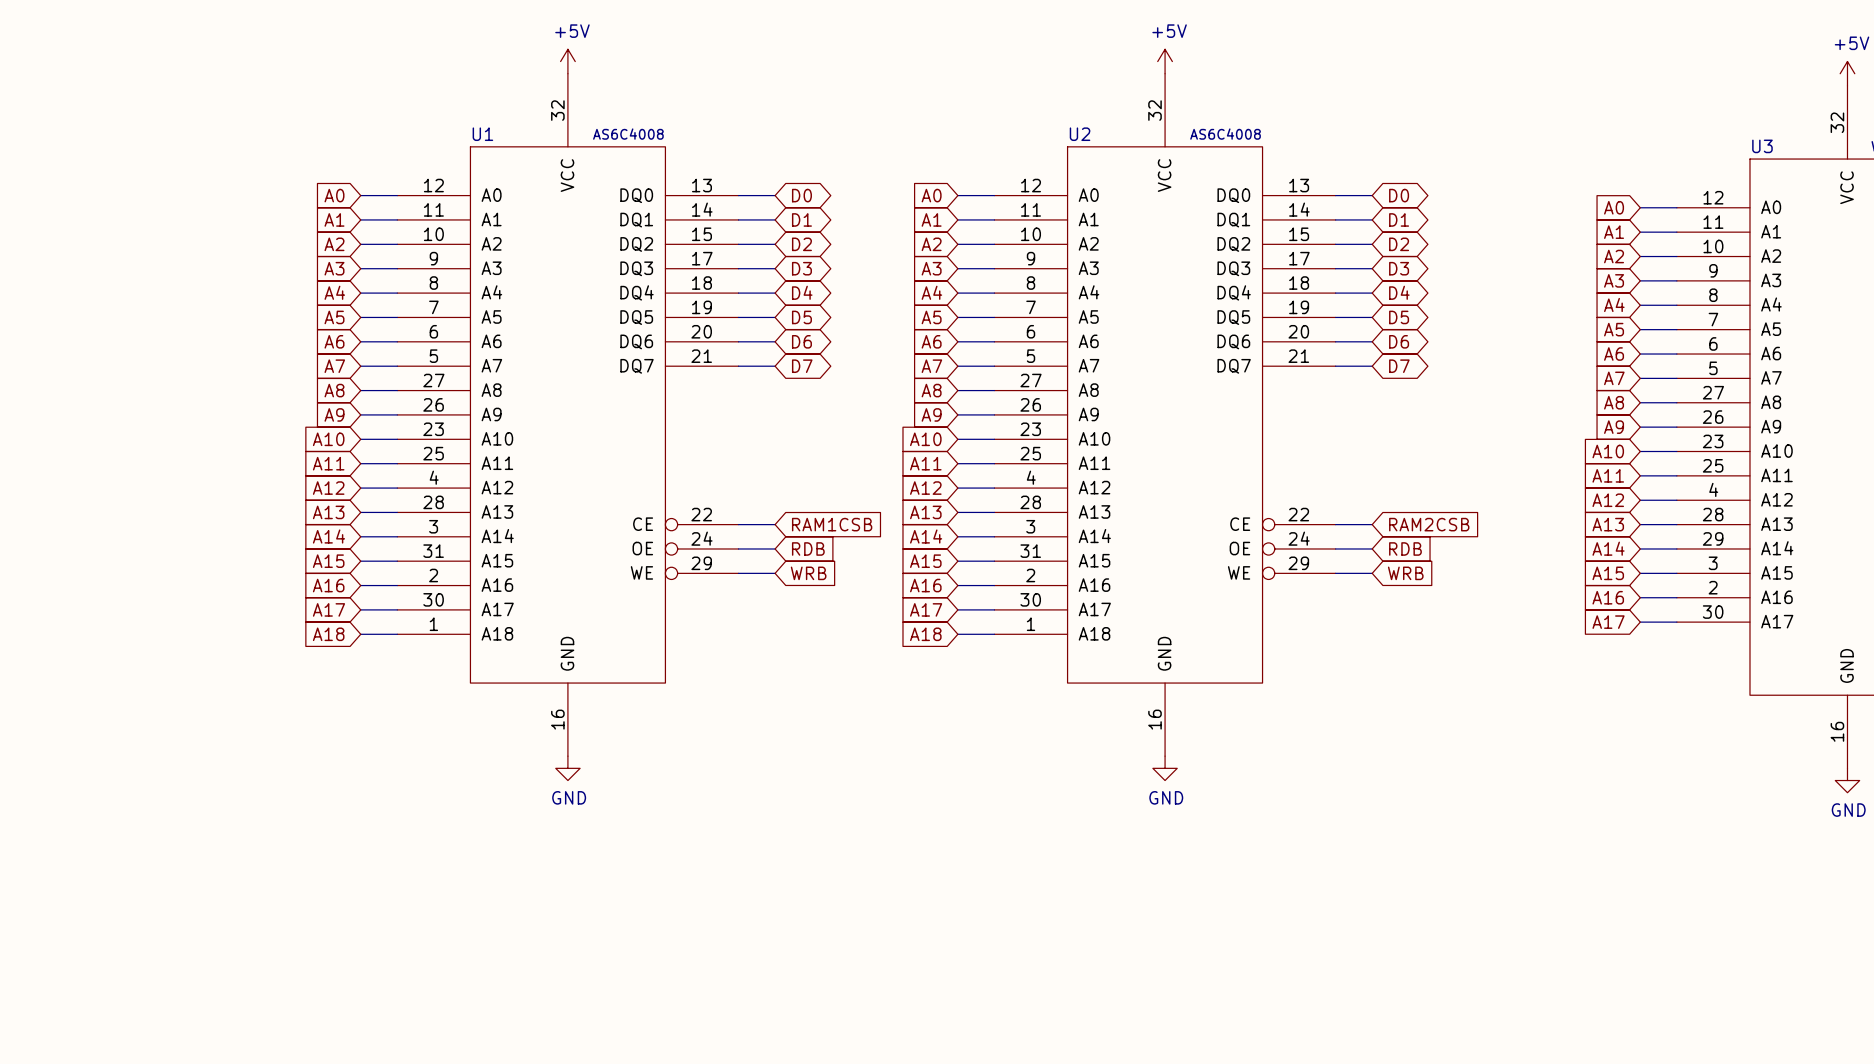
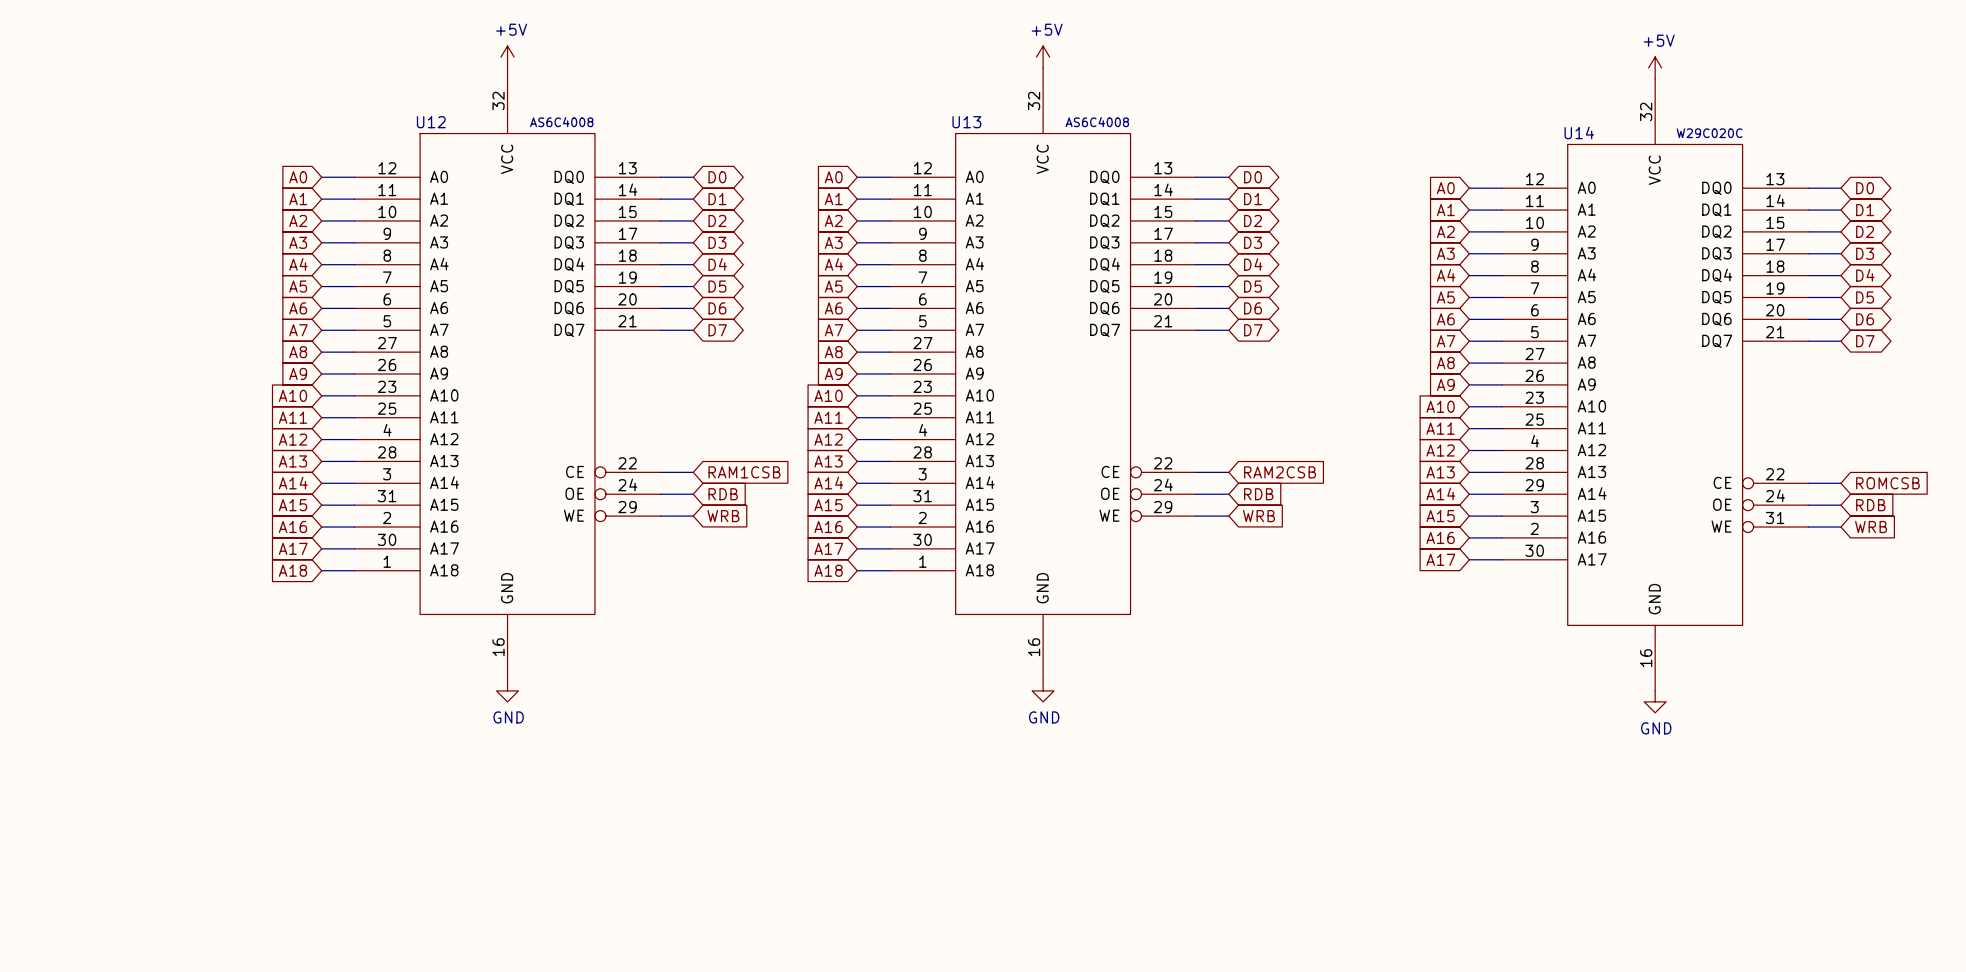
U1 name: U1 (482, 134) -> U12 (431, 122)
U2 name: U2 (1080, 134) -> U13 (966, 122)
U3 name: U3 (1762, 146) -> U14 (1579, 132)

